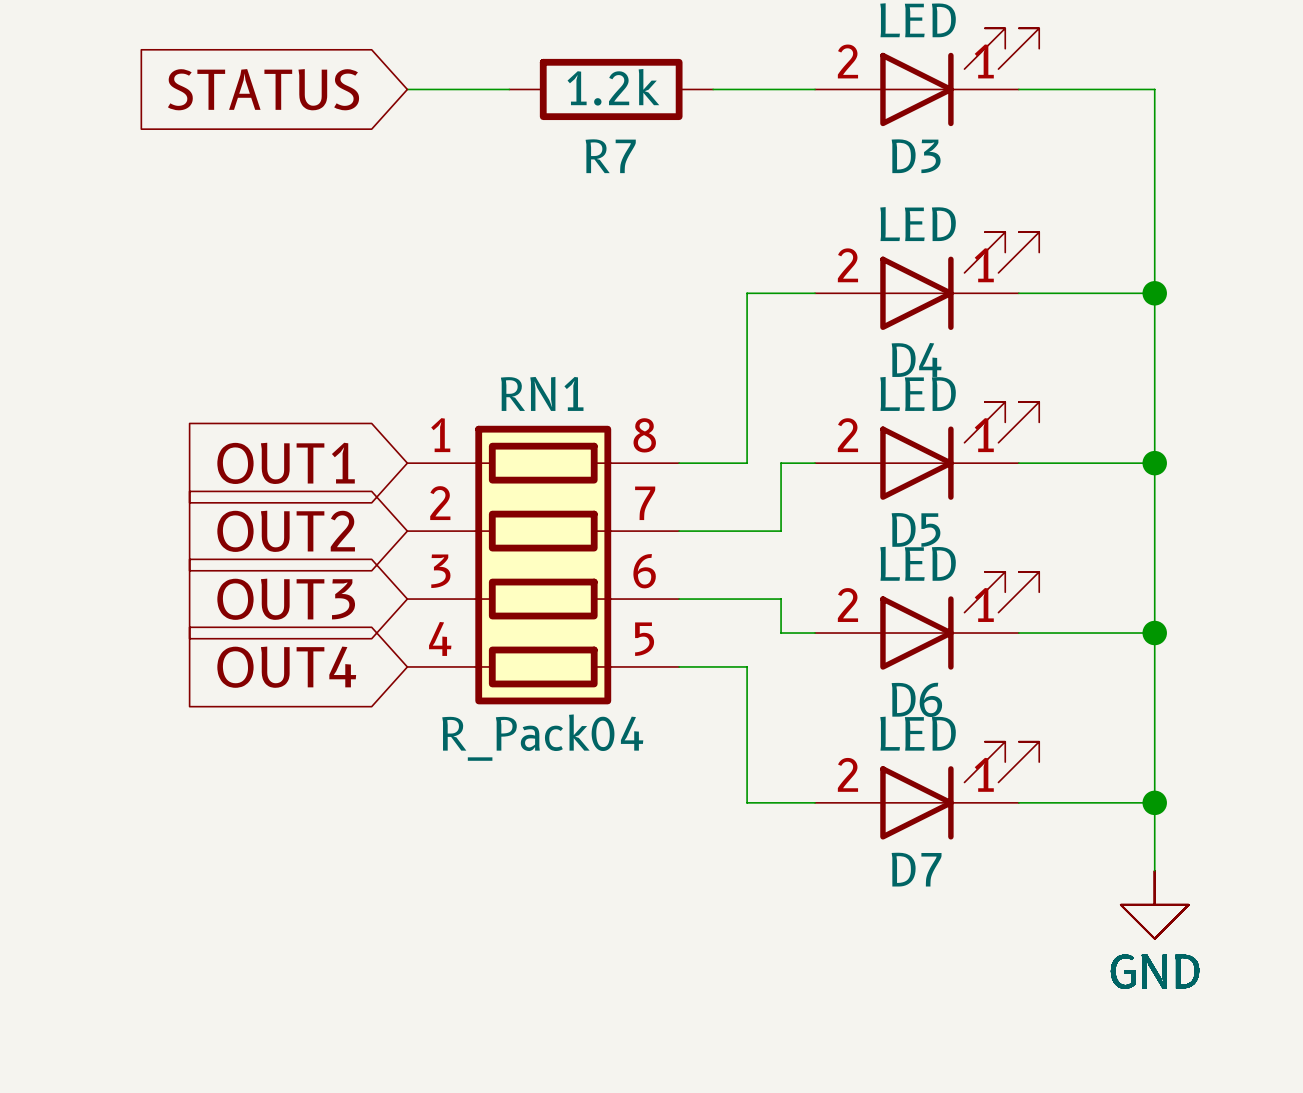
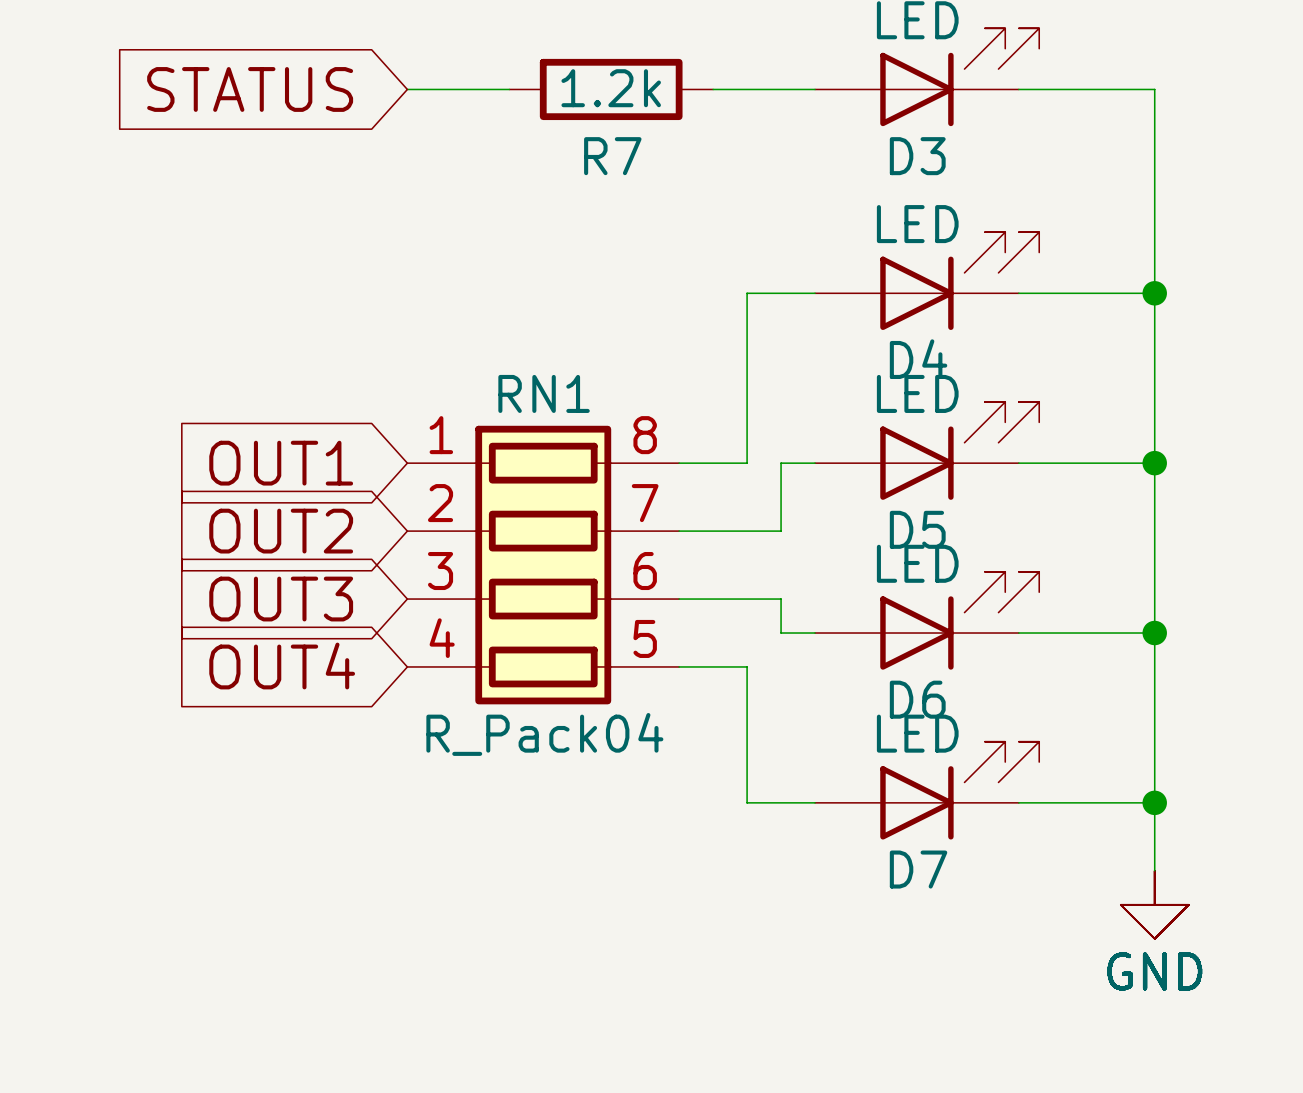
D3 pin number: 2 (847, 61) -> none
D3 pin number: 1 (984, 61) -> none
D4 pin number: 2 (847, 265) -> none
D4 pin number: 1 (984, 265) -> none
D5 pin number: 2 (847, 435) -> none
D5 pin number: 1 (984, 435) -> none
D6 pin number: 1 (984, 604) -> none
D6 pin number: 2 (847, 605) -> none
D7 pin number: 2 (847, 774) -> none
D7 pin number: 1 (984, 774) -> none

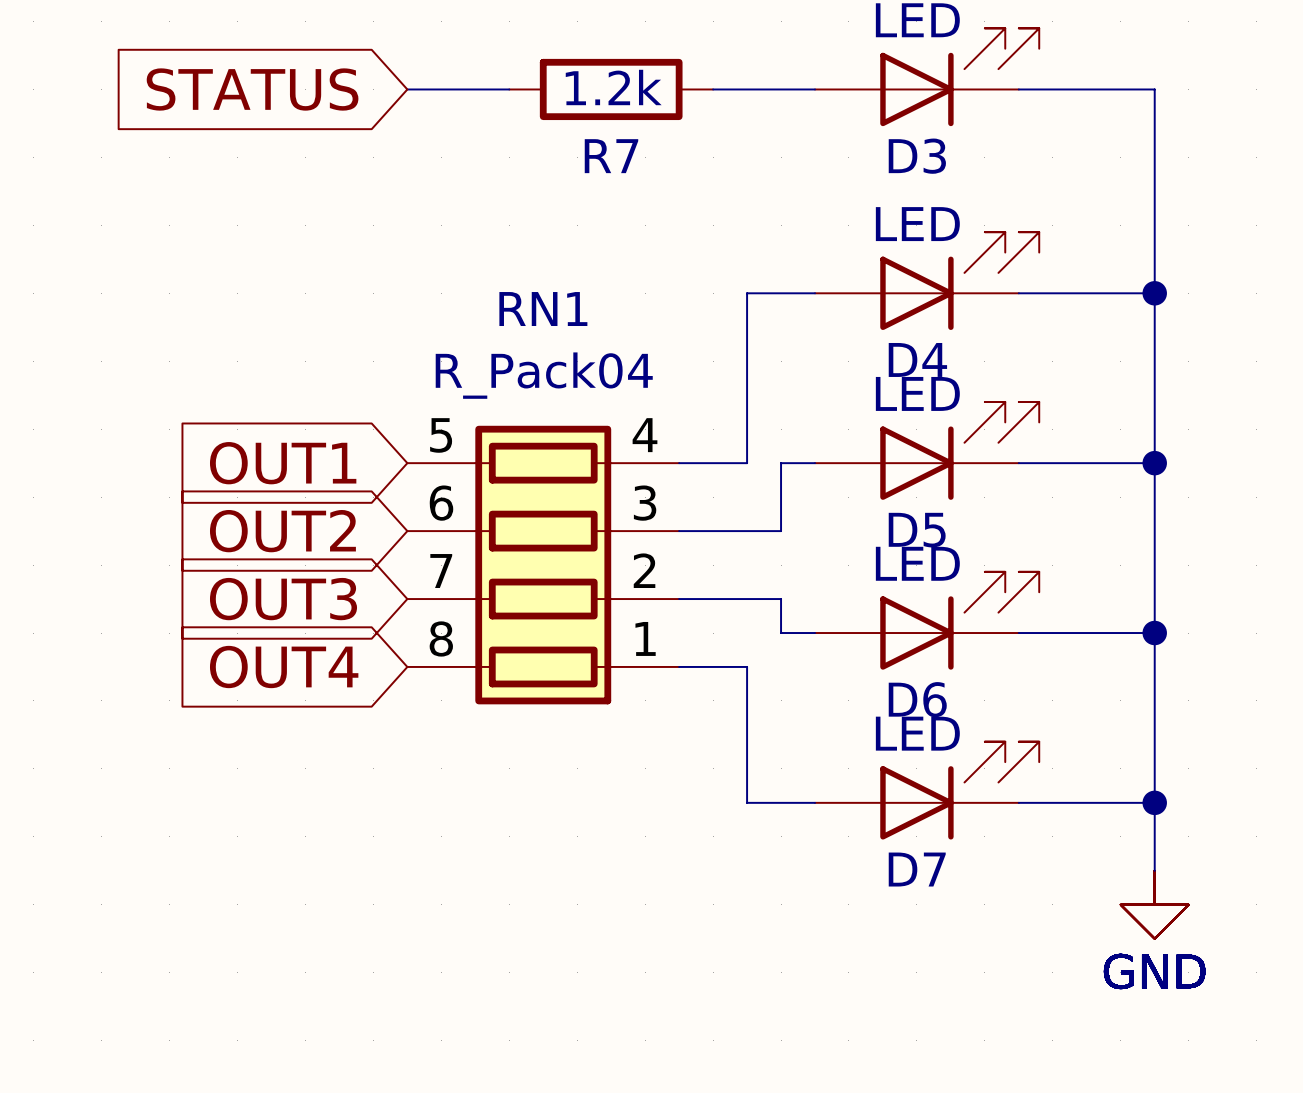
RN1 name position: RN1 (544, 393) -> RN1 (543, 309)
RN1 rotation: 0° (543, 565) -> 180° (543, 565)

